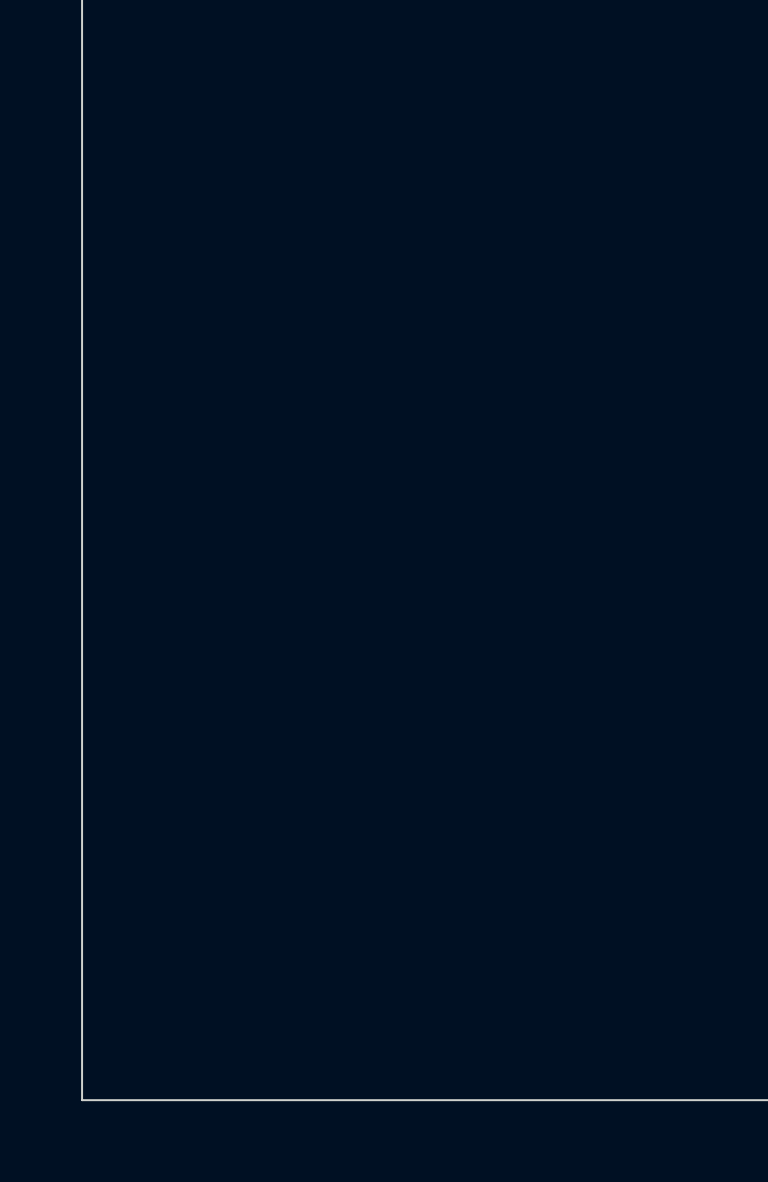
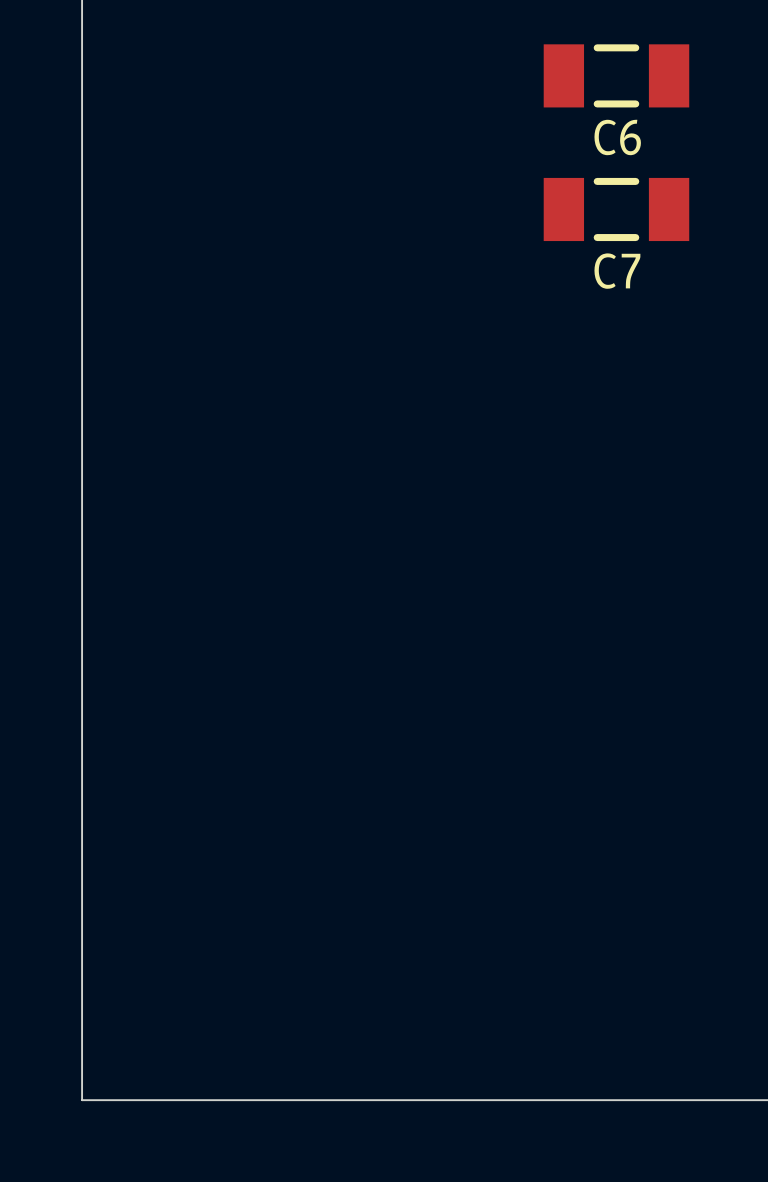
C6: none -> (616, 75)
C7: none -> (616, 209)

